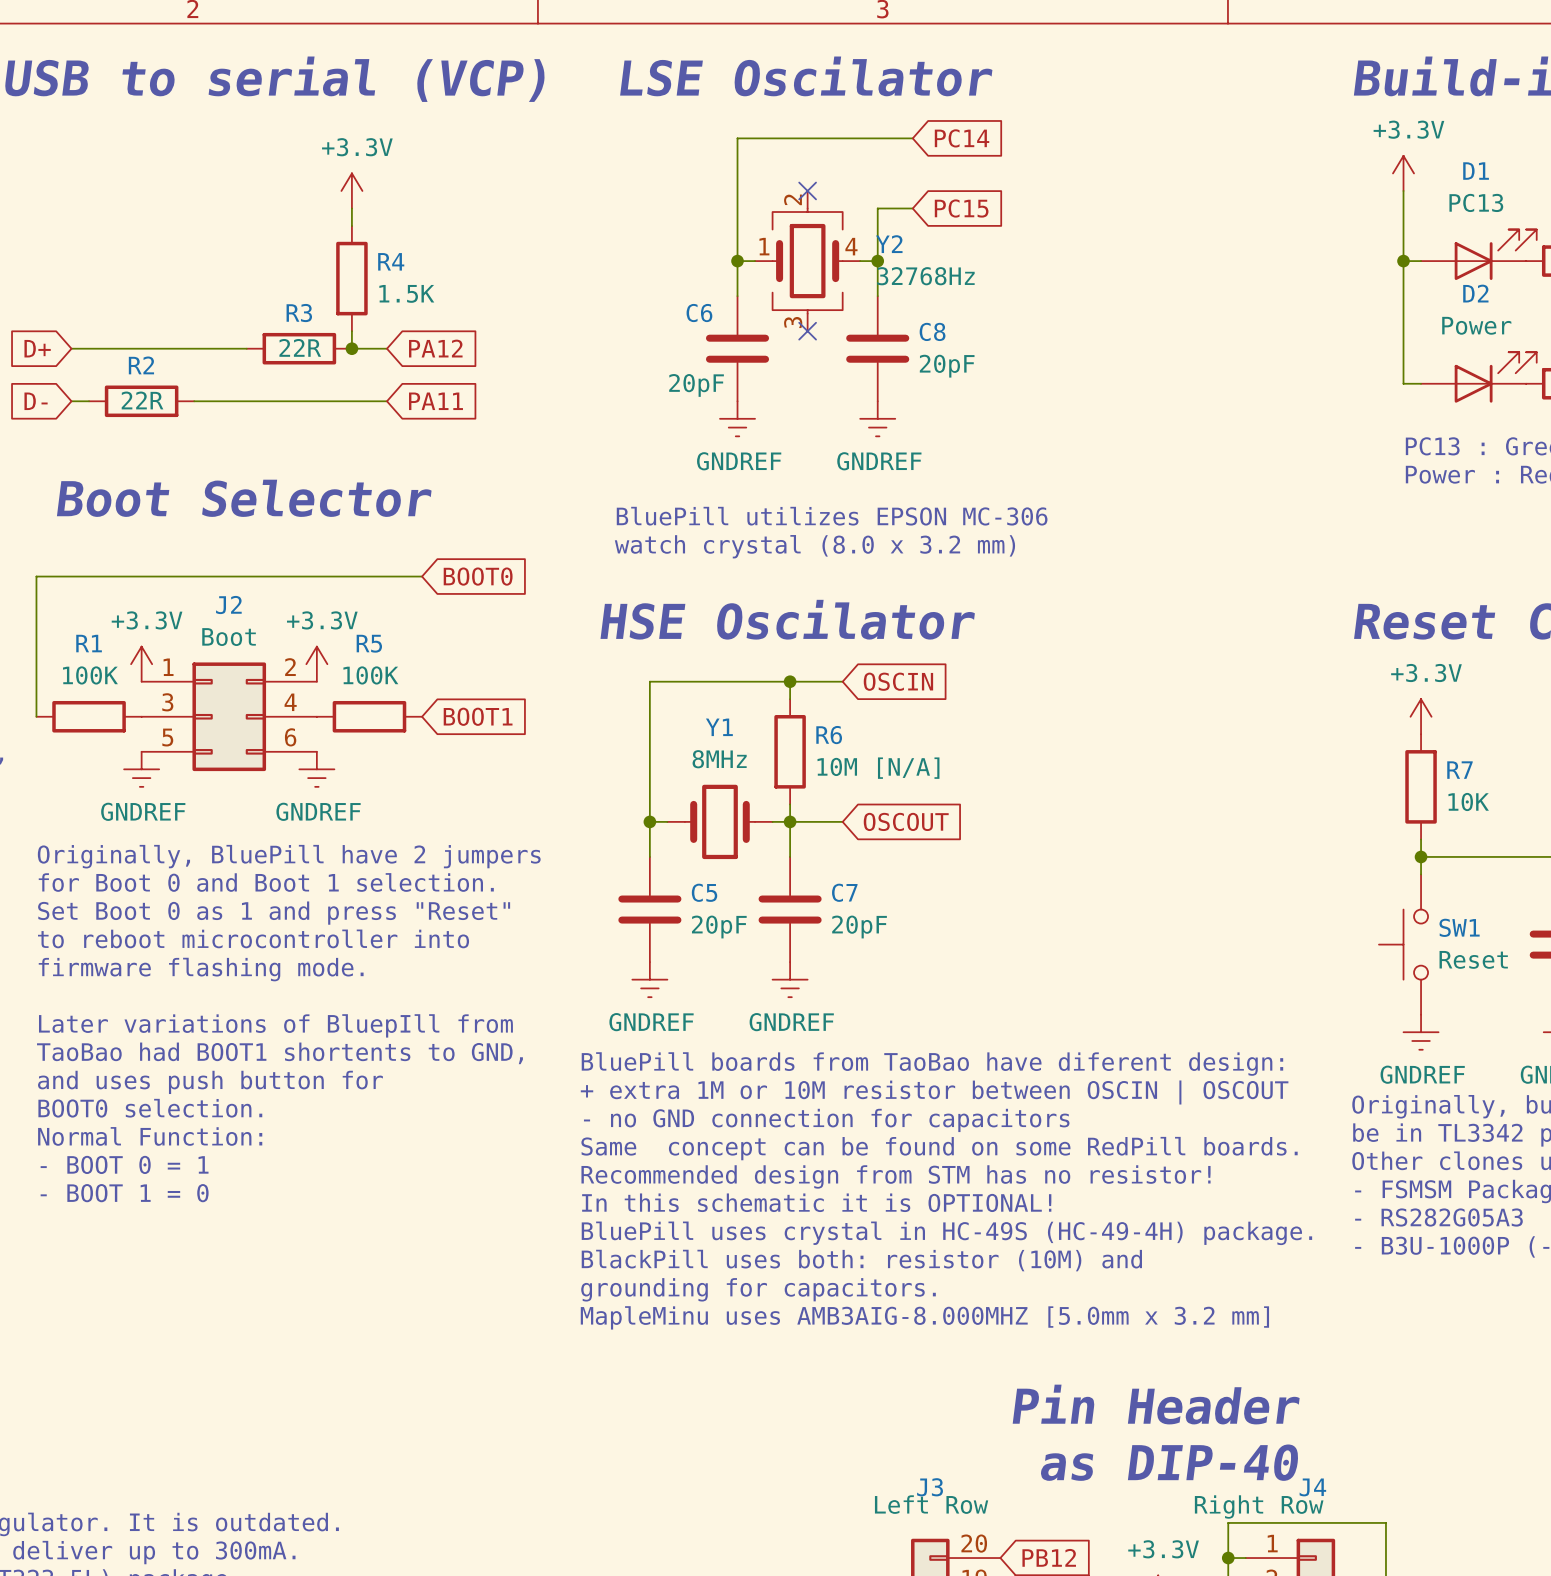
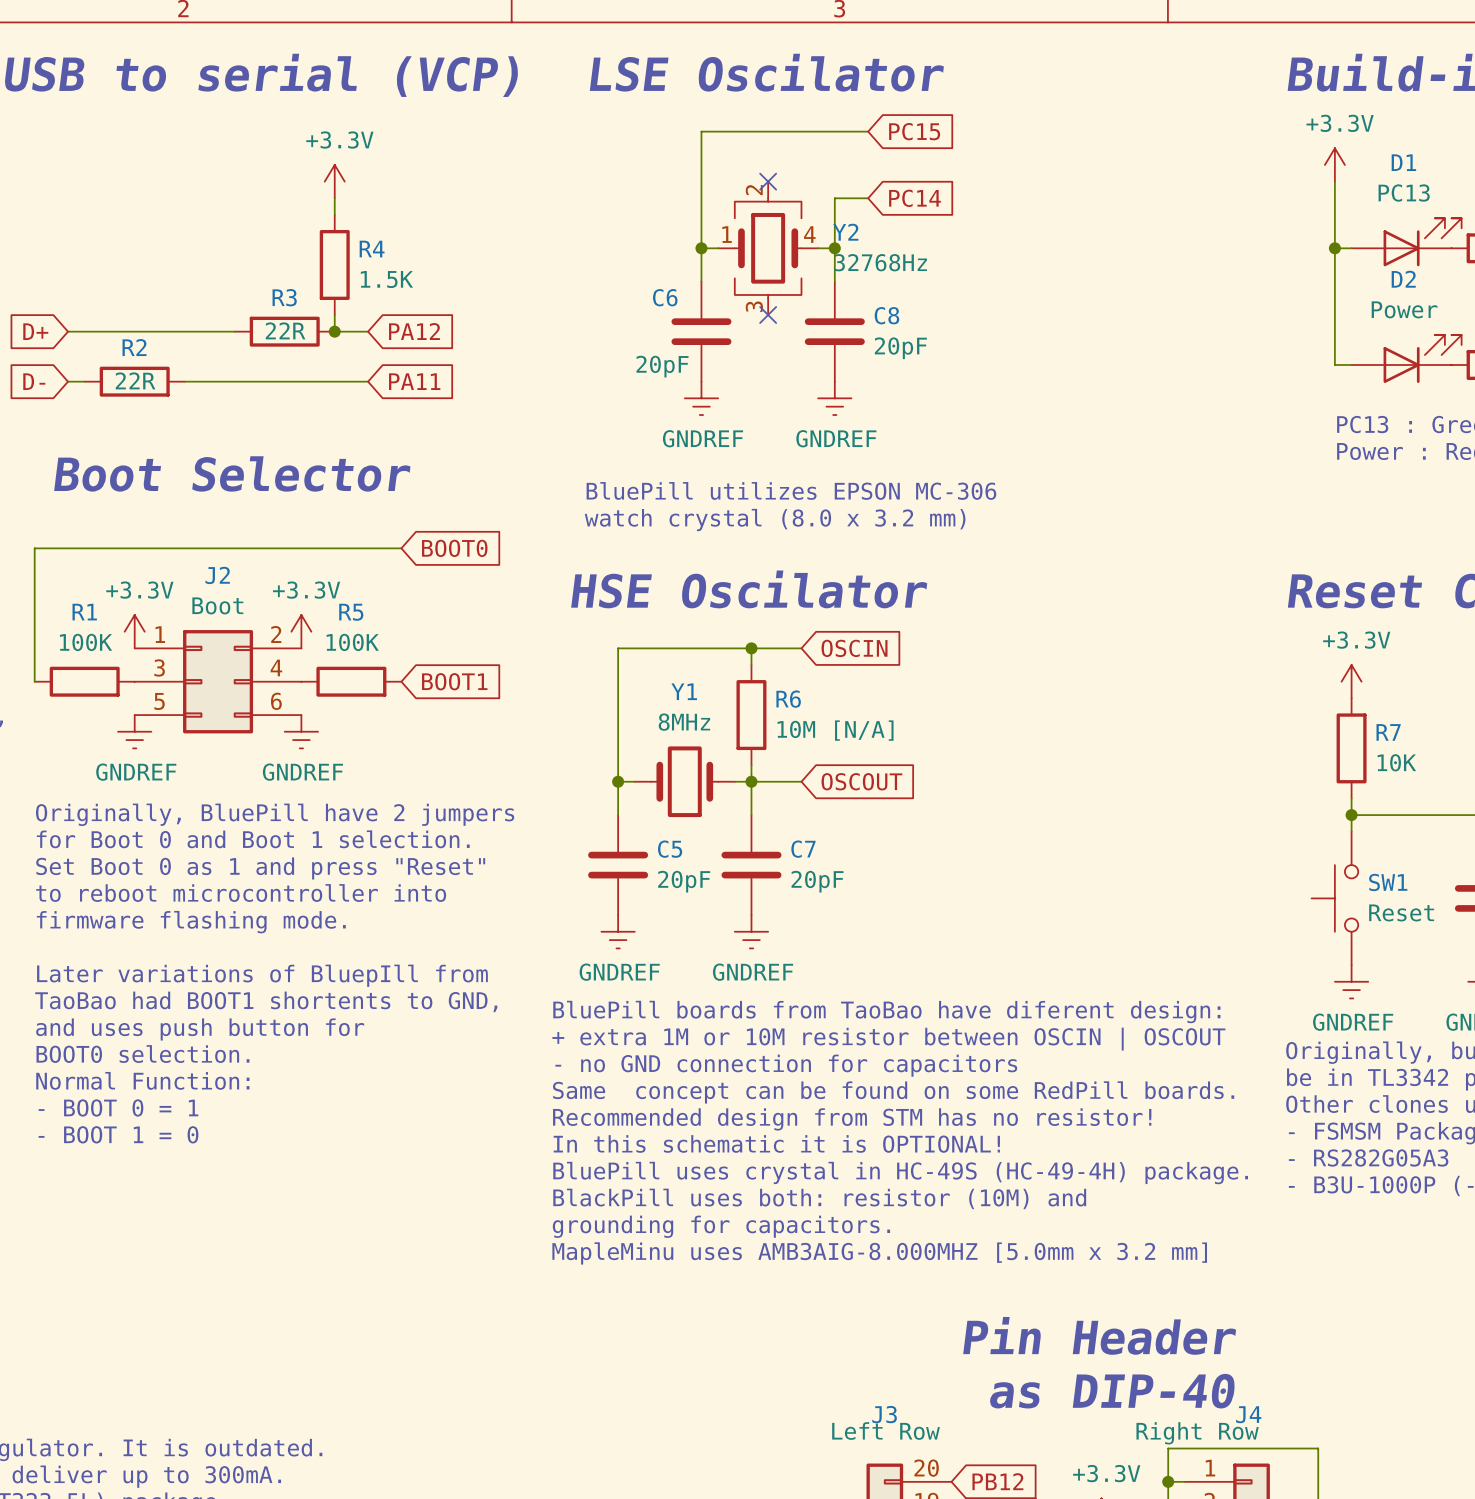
global label: PC14 (962, 138) -> PC15 (914, 131)
global label: PC15 (961, 208) -> PC14 (914, 198)

